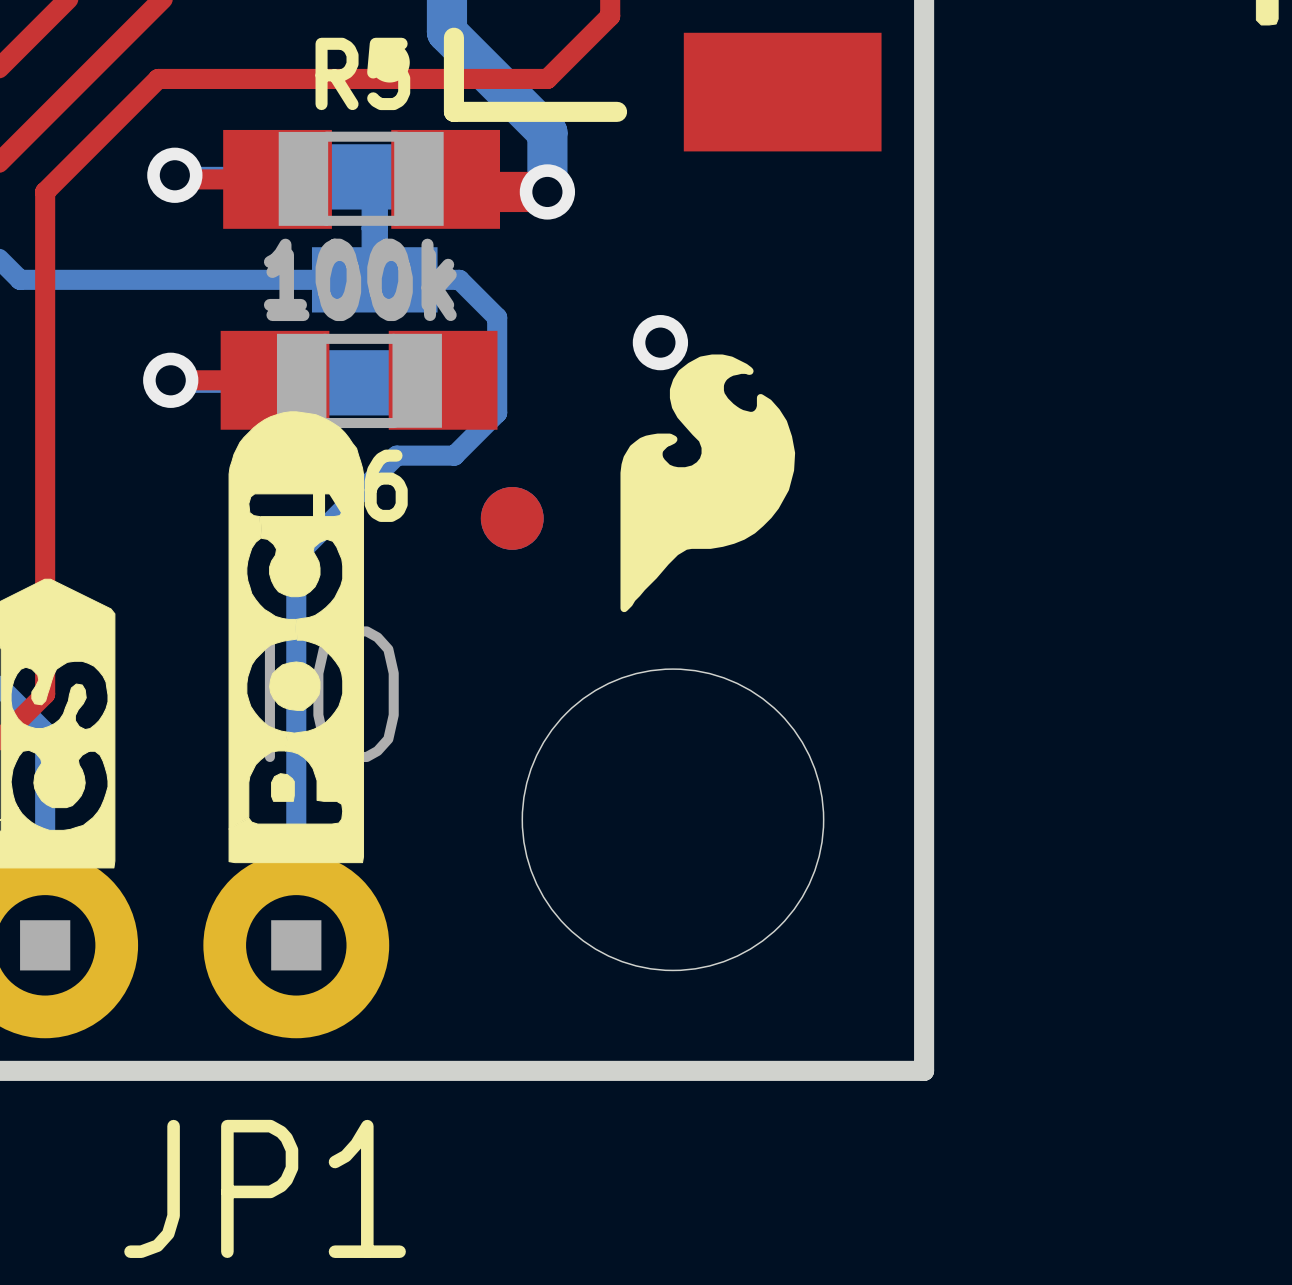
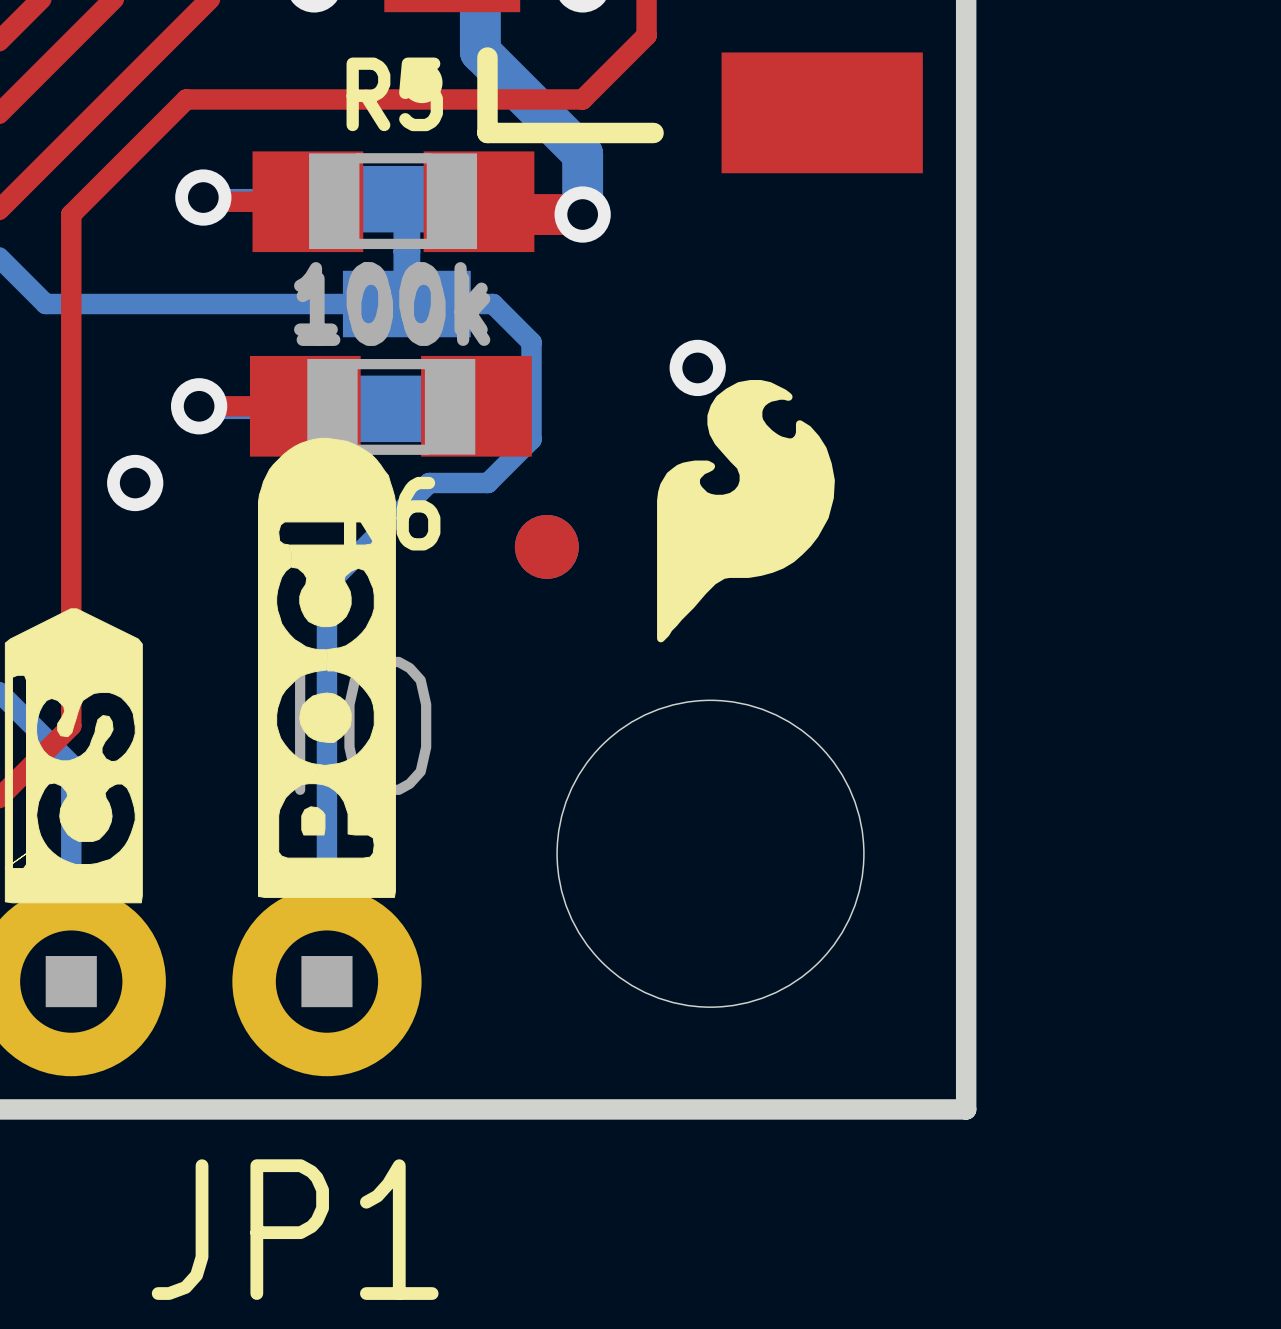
via: none -> (135, 483)

